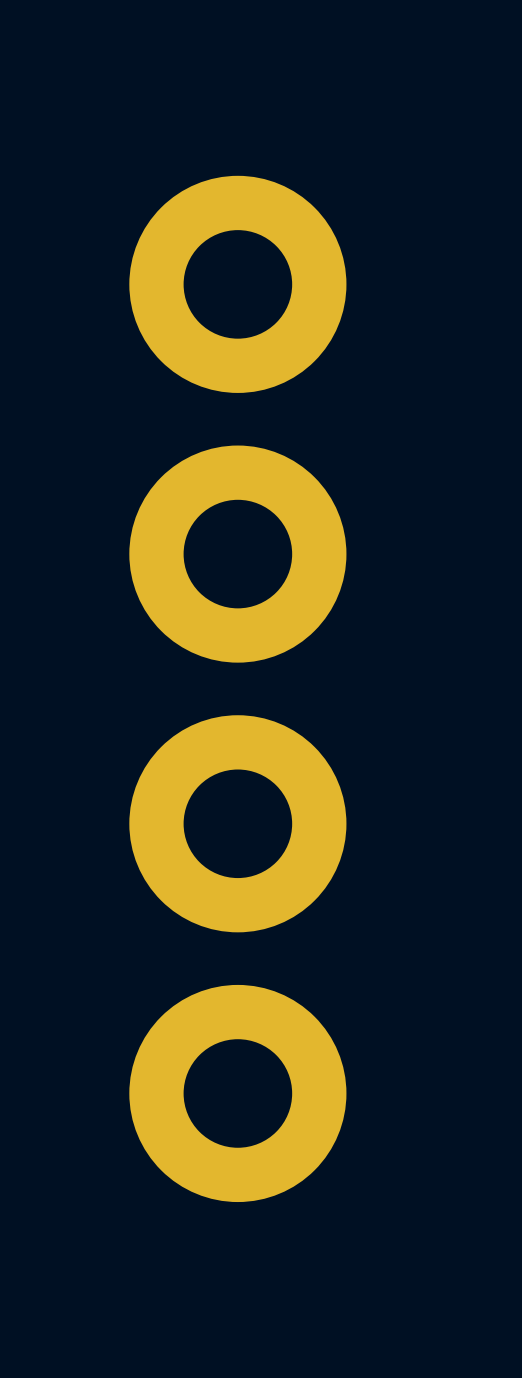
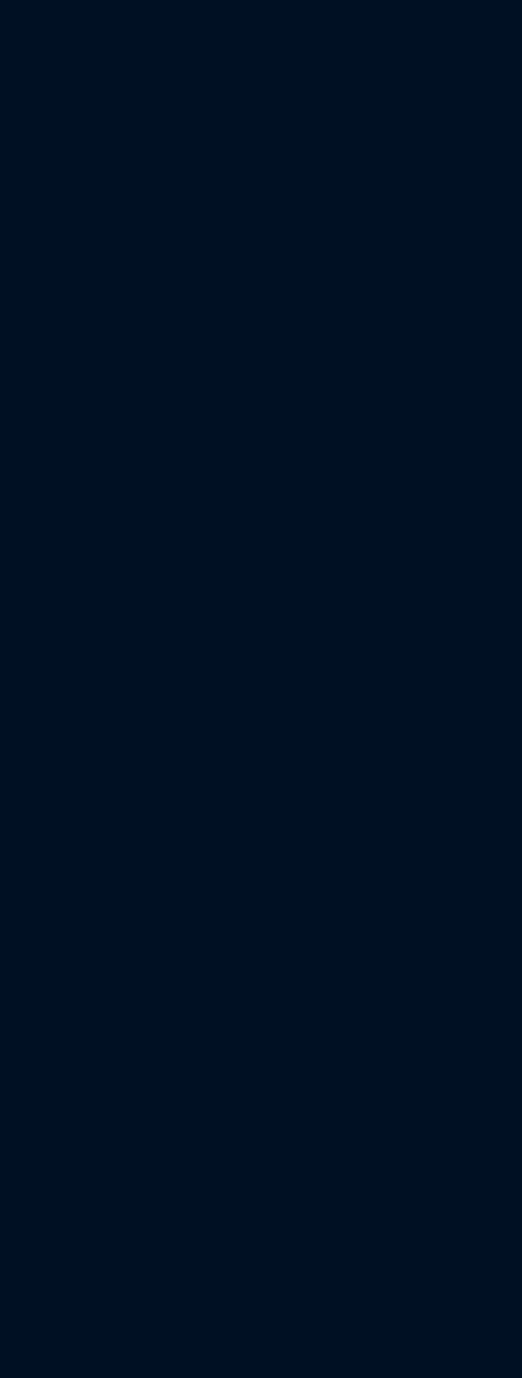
part: (237, 284) -> none
part: (237, 554) -> none
part: (237, 823) -> none
part: (237, 1093) -> none

